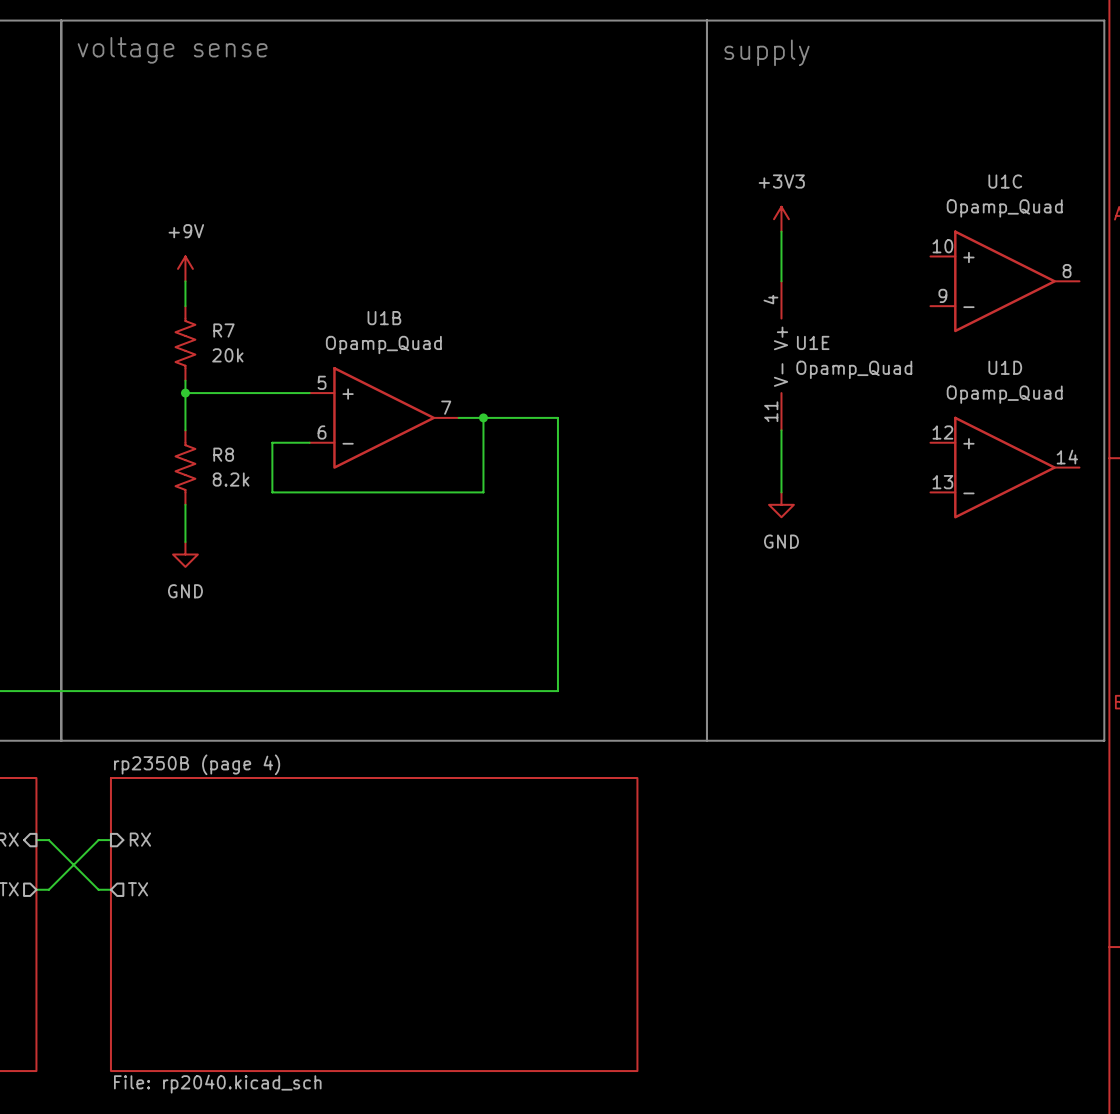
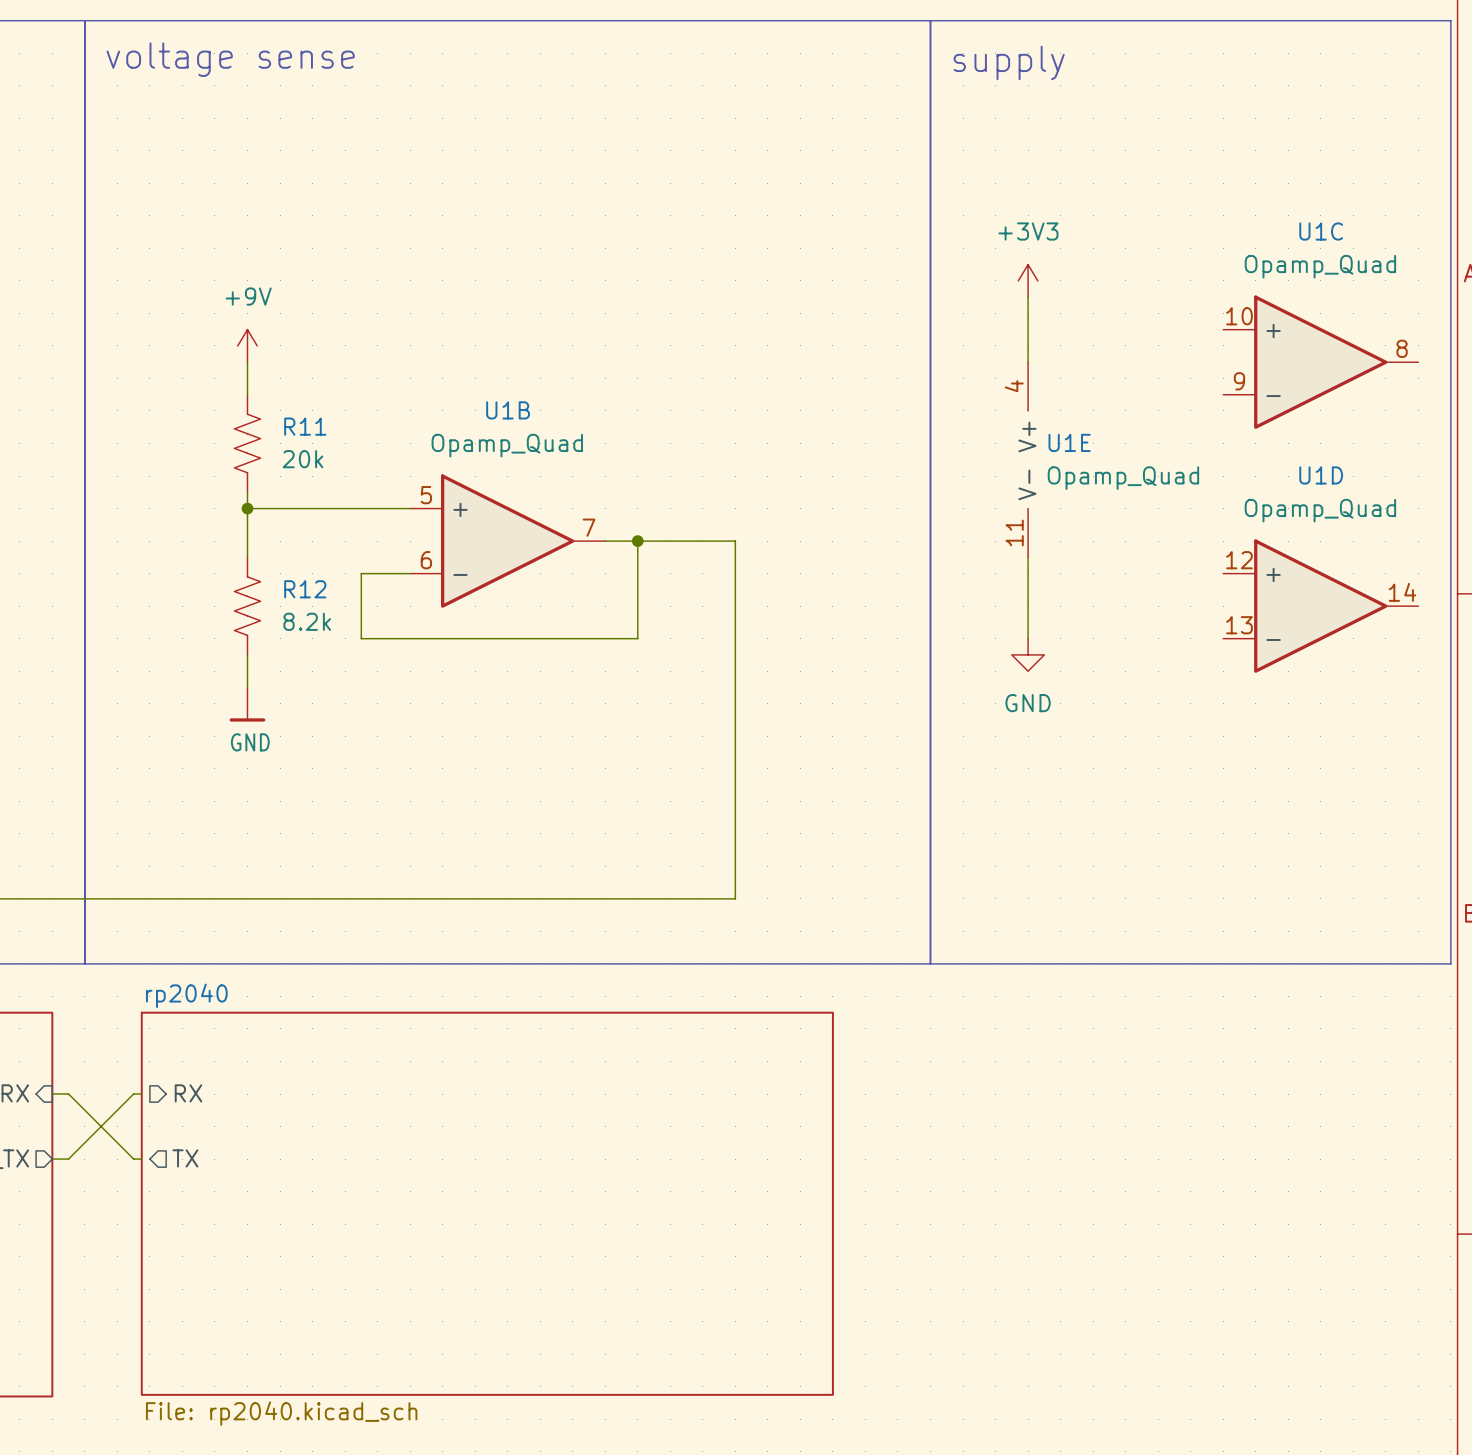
R7 name: R7 (223, 330) -> R11 (305, 426)
R8 name: R8 (223, 454) -> R12 (305, 589)
power symbol: none -> GND (247, 704)
power symbol: GND (185, 554) -> none
wire: (104, 840) (110, 840) -> none
wire: (104, 889) (110, 889) -> none
sheet rp2040: none -> File: rp2040.kicad_sch (487, 1203)
sheet rp2350B (page 4): File: rp2040.kicad_sch (374, 924) -> none

